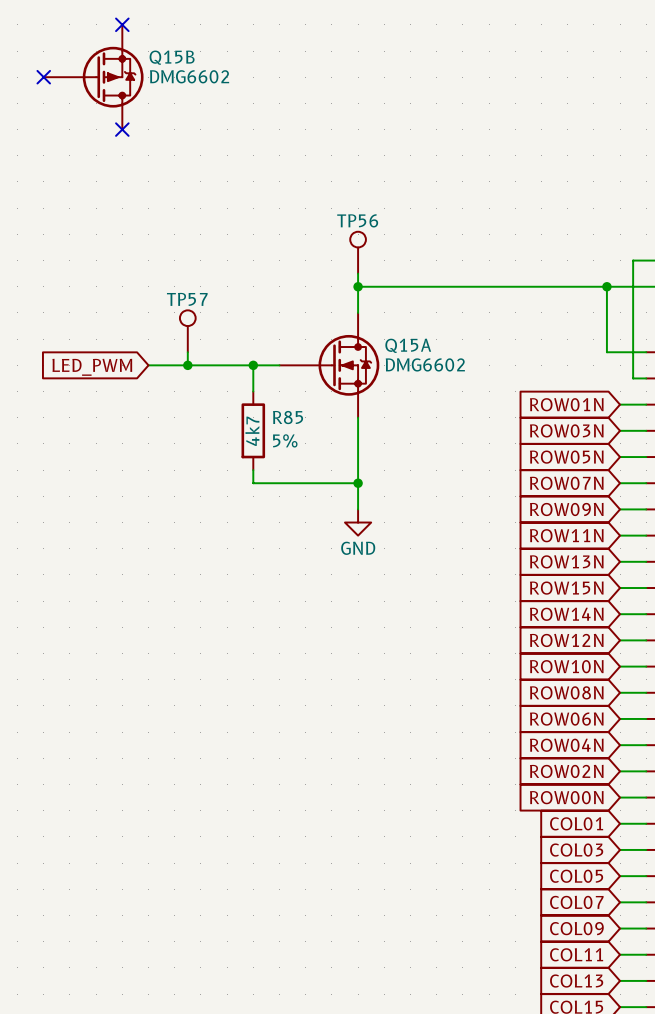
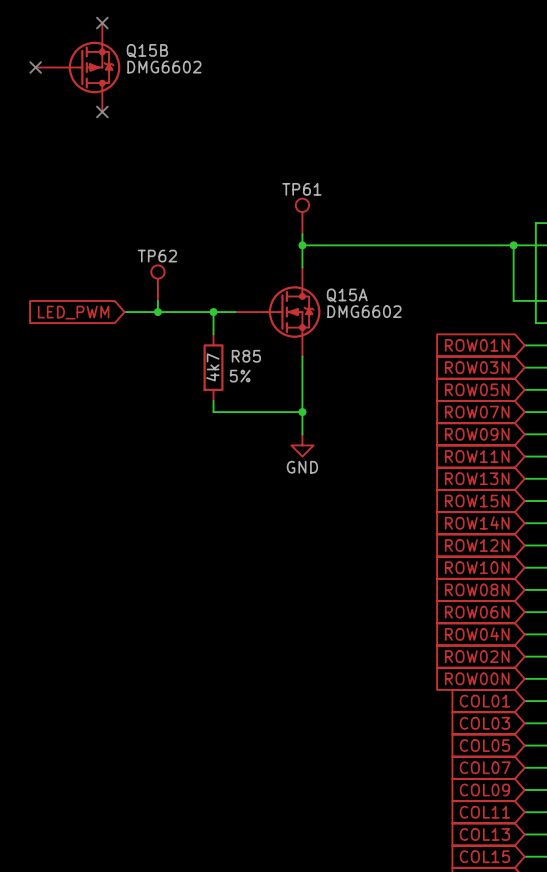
TP56 name: TP56 (357, 220) -> TP61 (301, 189)
TP57 name: TP57 (187, 299) -> TP62 (157, 256)

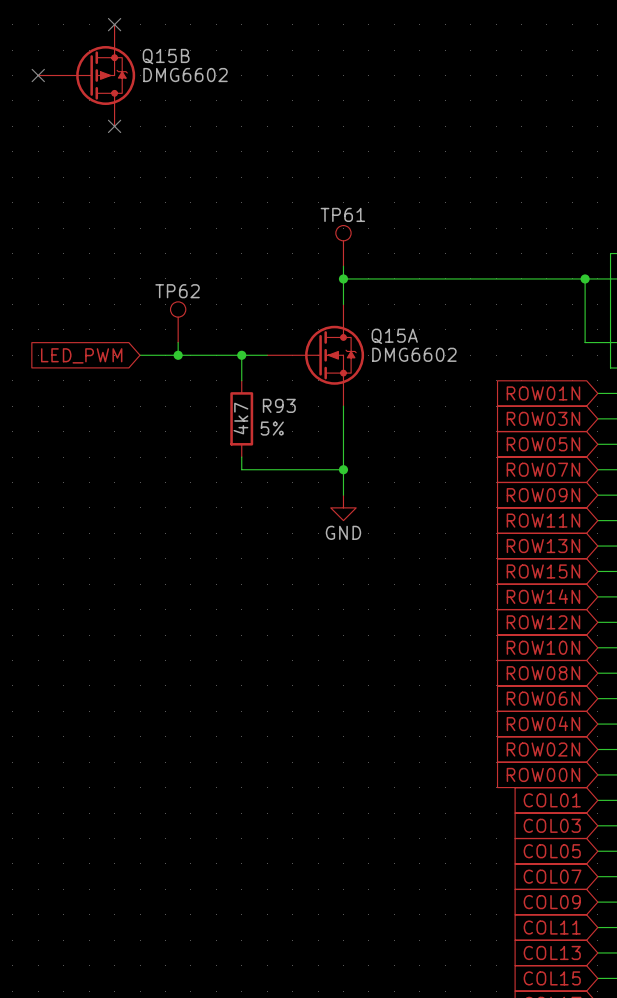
R85 name: R85 (246, 356) -> R93 (279, 405)

